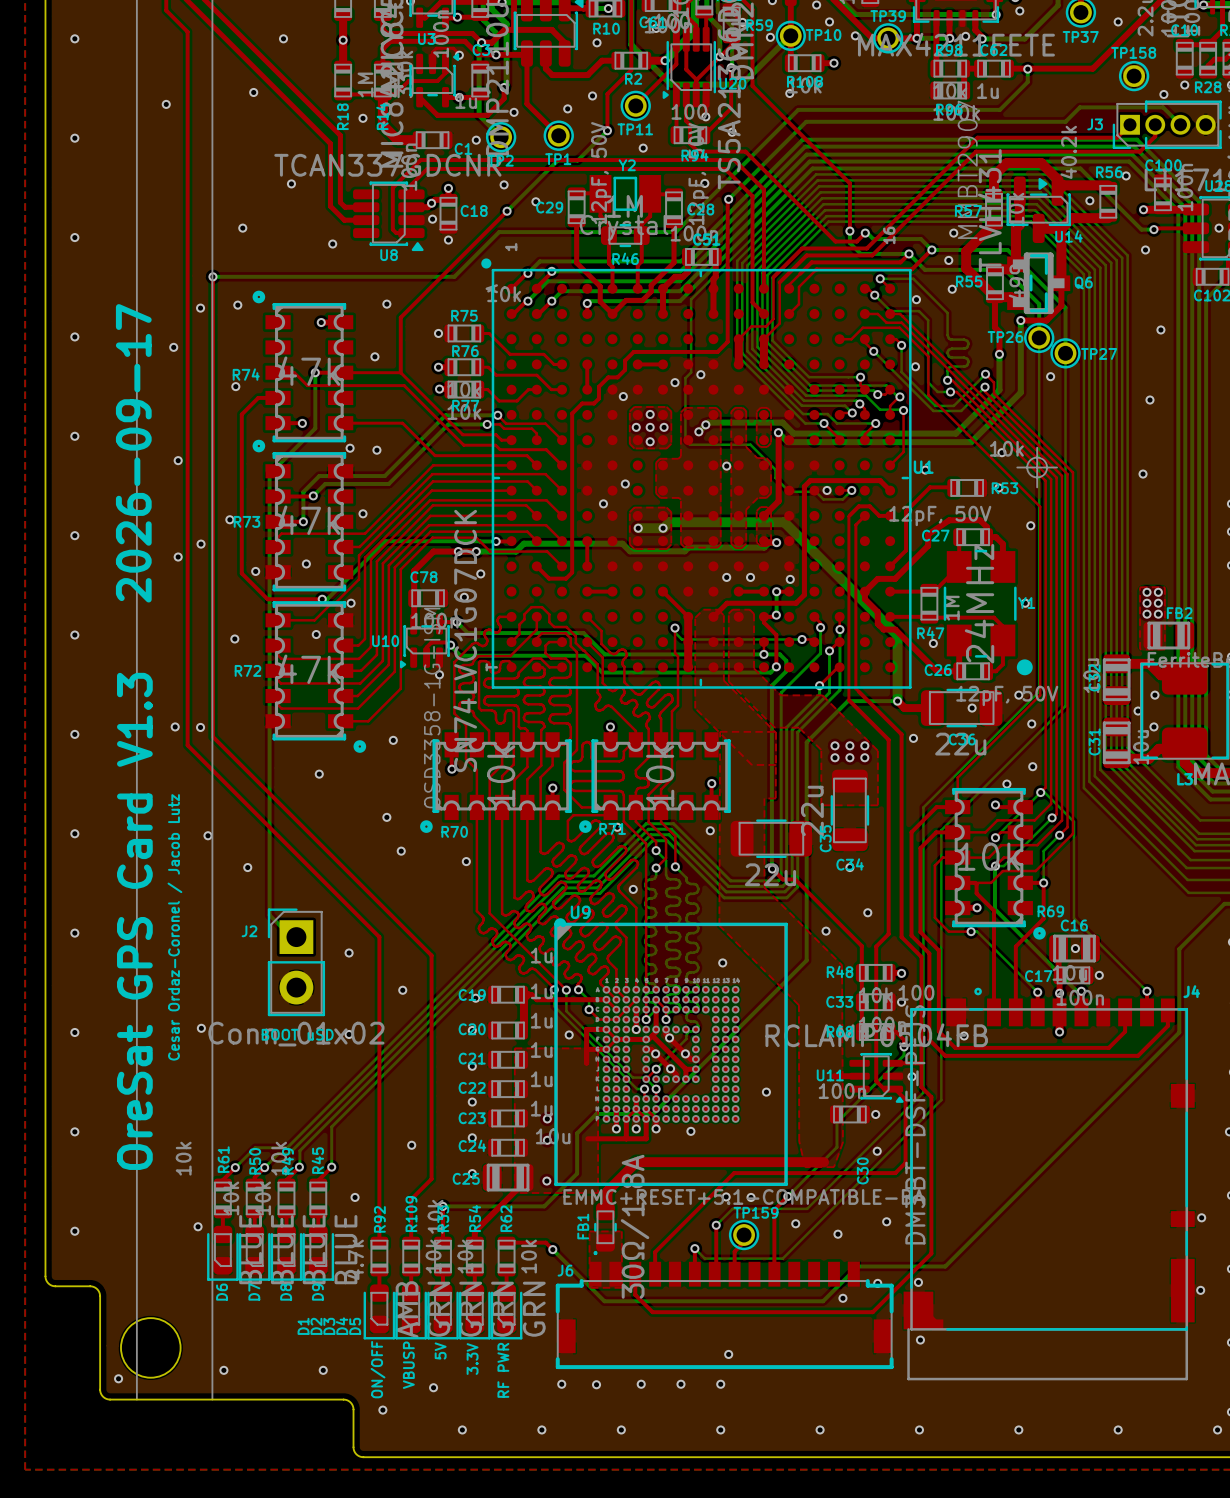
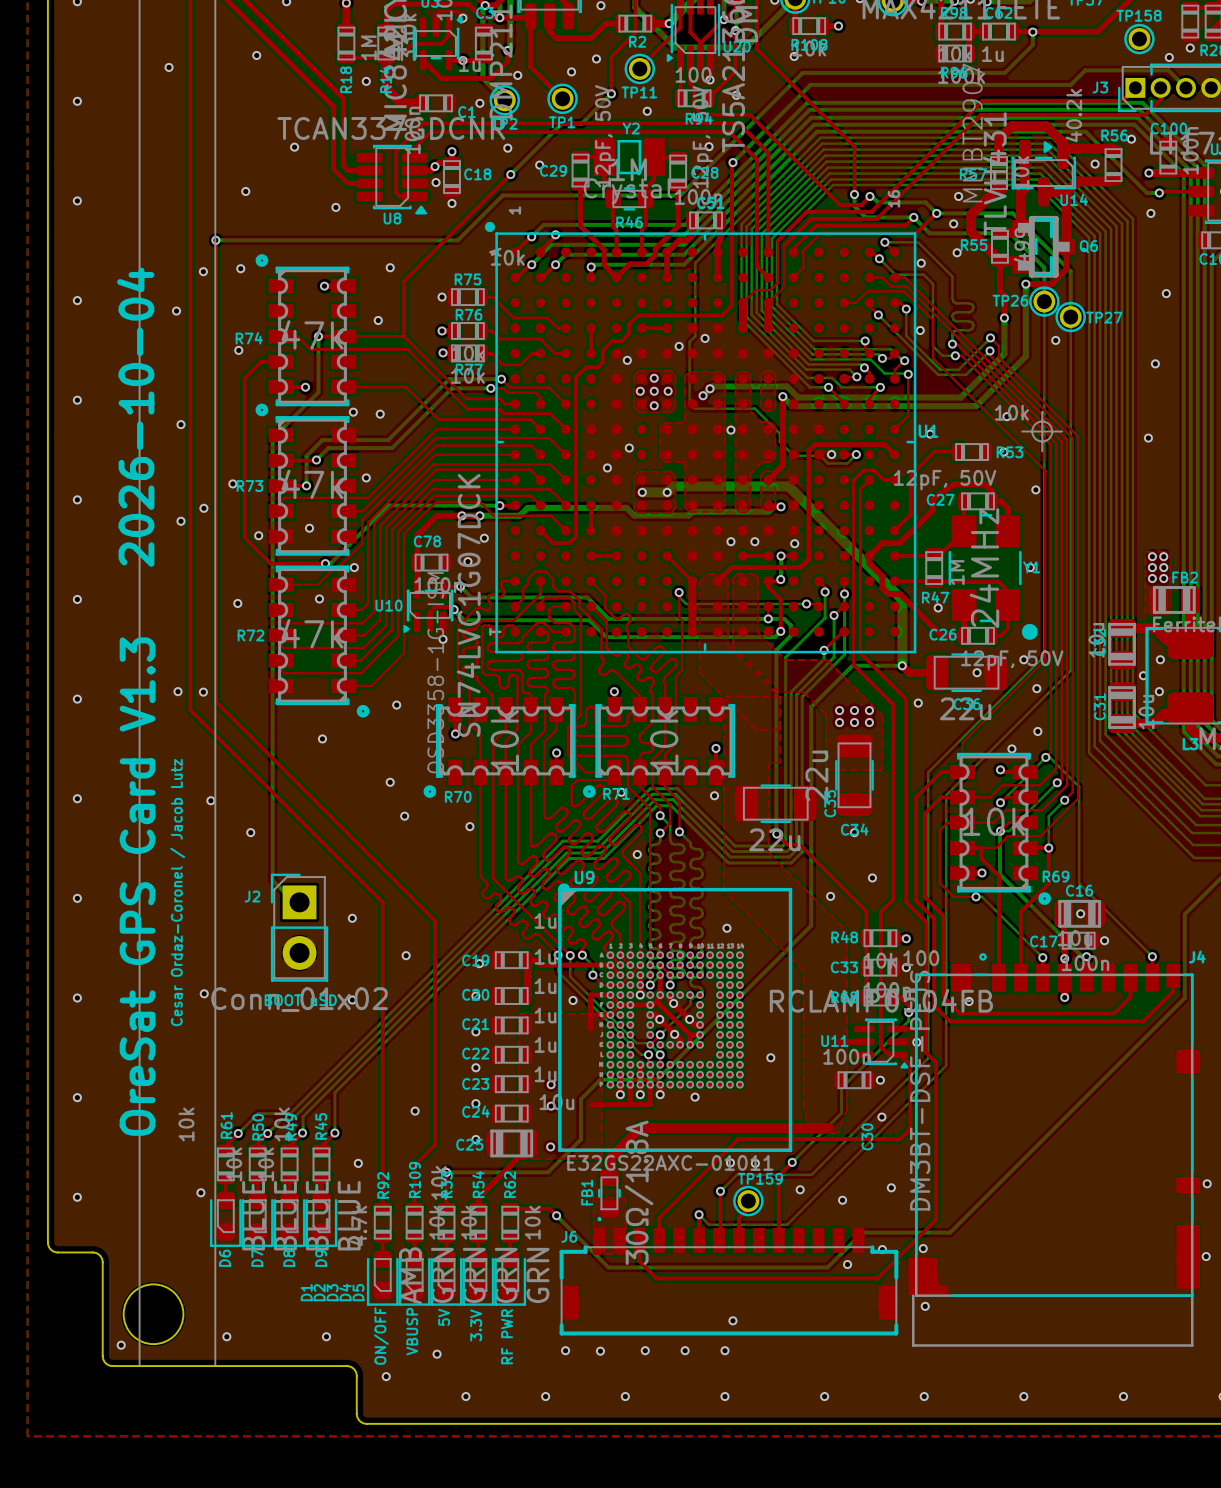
text: 2026-09-17 (133, 453) -> 2026-10-04 (135, 417)
U9 value: EMMC+RESET+5.1-COMPATIBLE-BA (744, 1196) -> E32GS22AXC-01011 (670, 1162)

